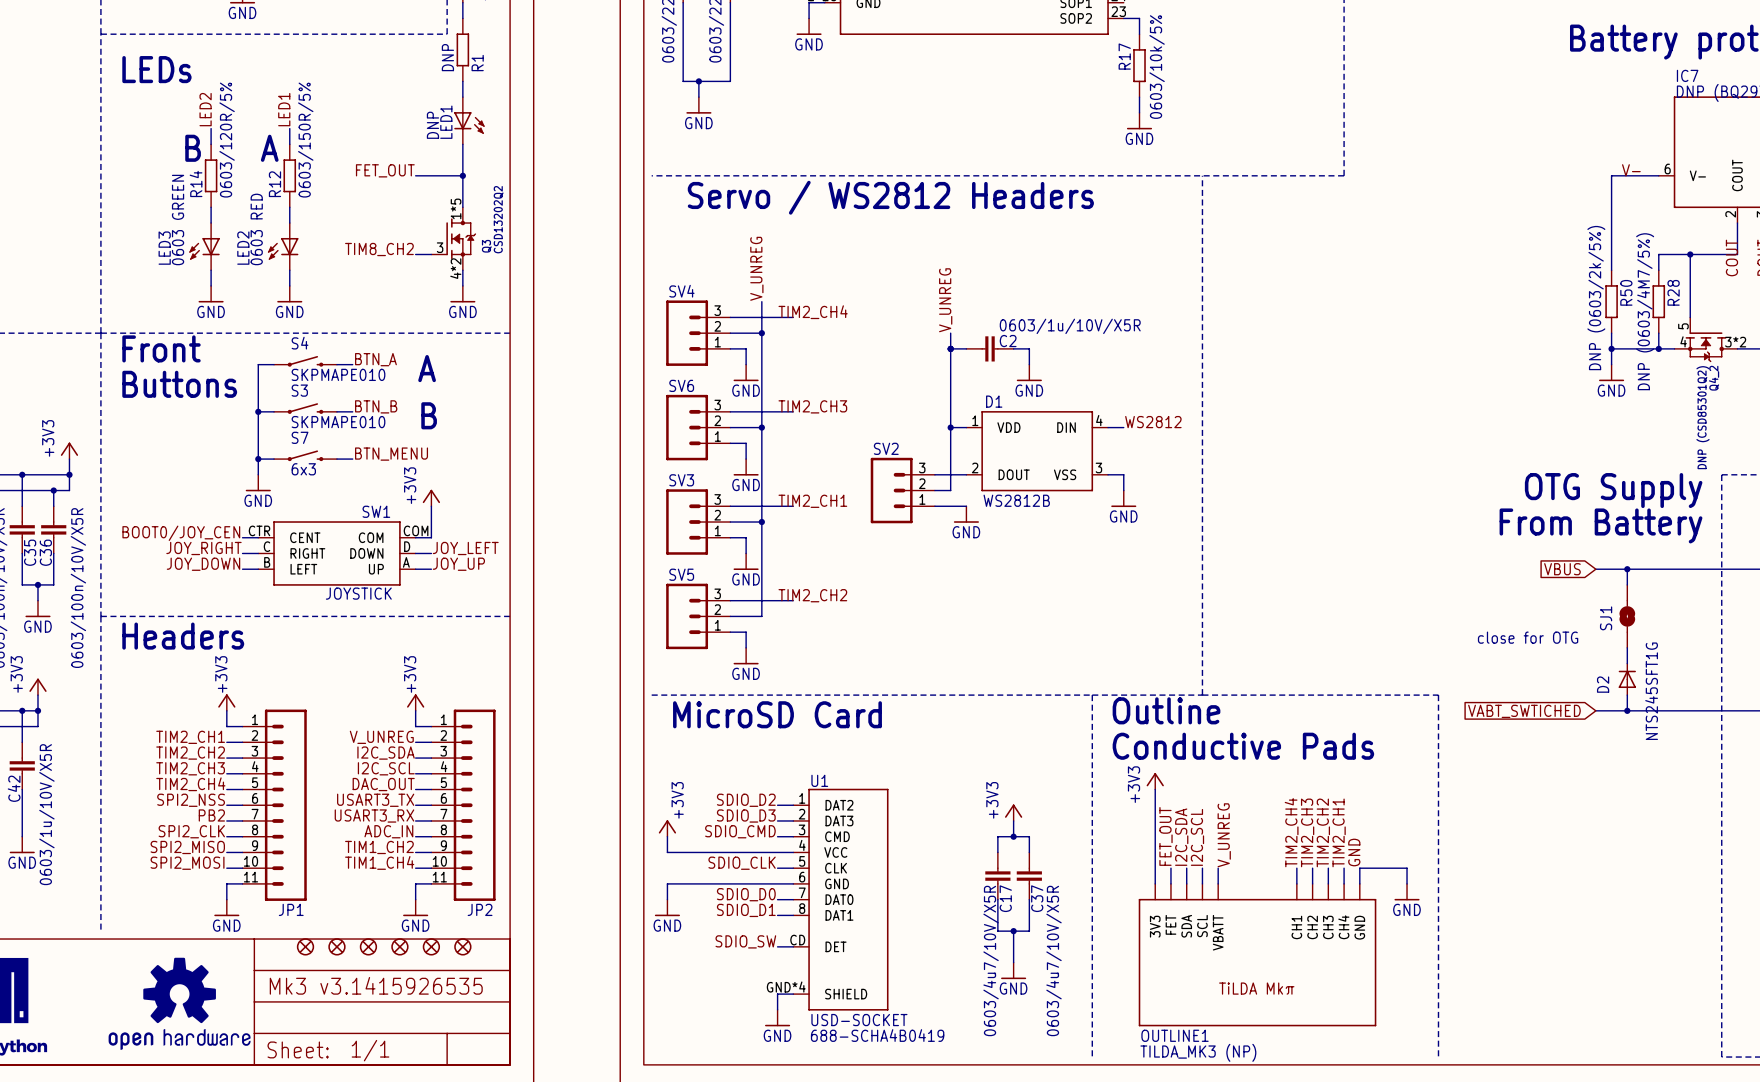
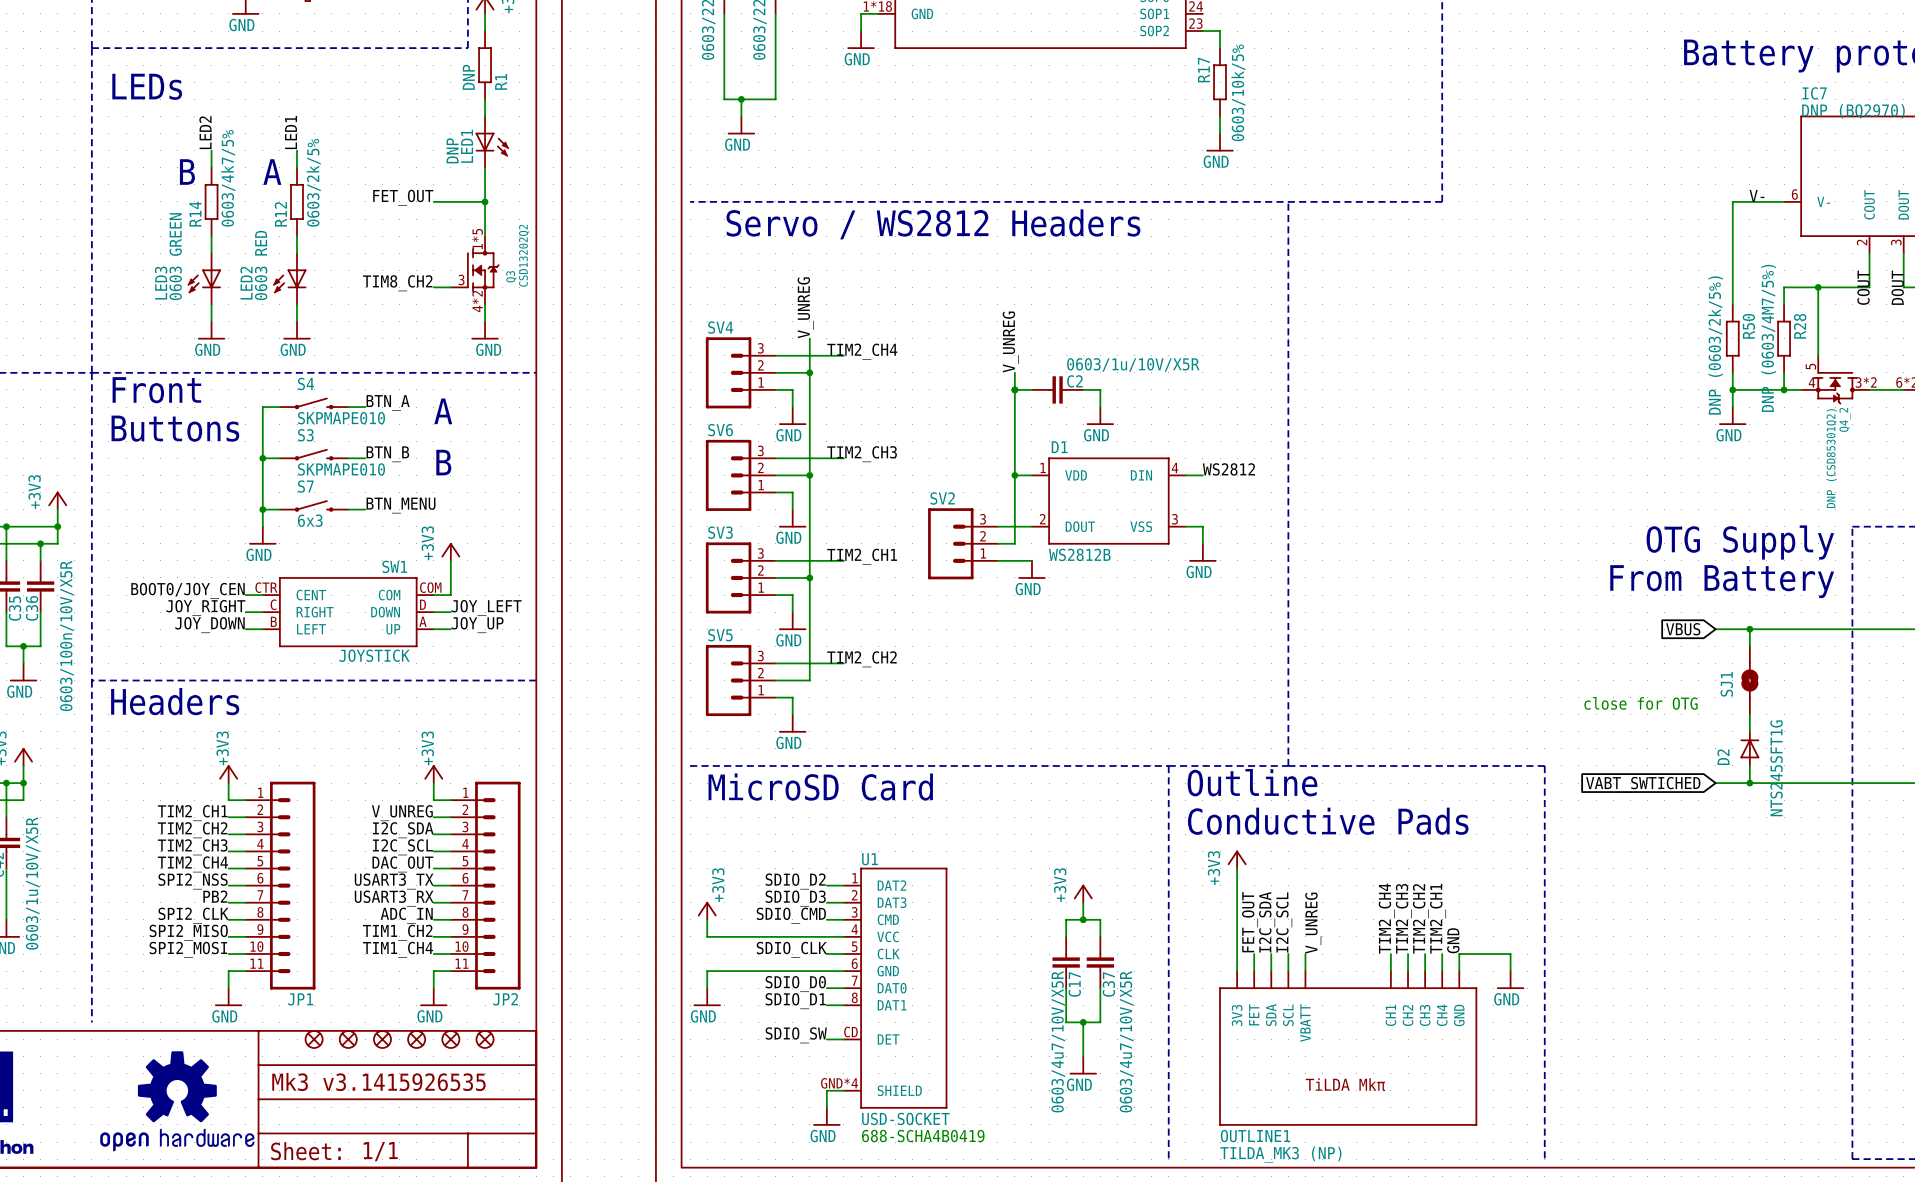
R14 value: 0603/120R/5% (227, 140) -> 0603/4k7/5% (228, 178)
R12 value: 0603/150R/5% (305, 140) -> 0603/2k/5% (313, 182)

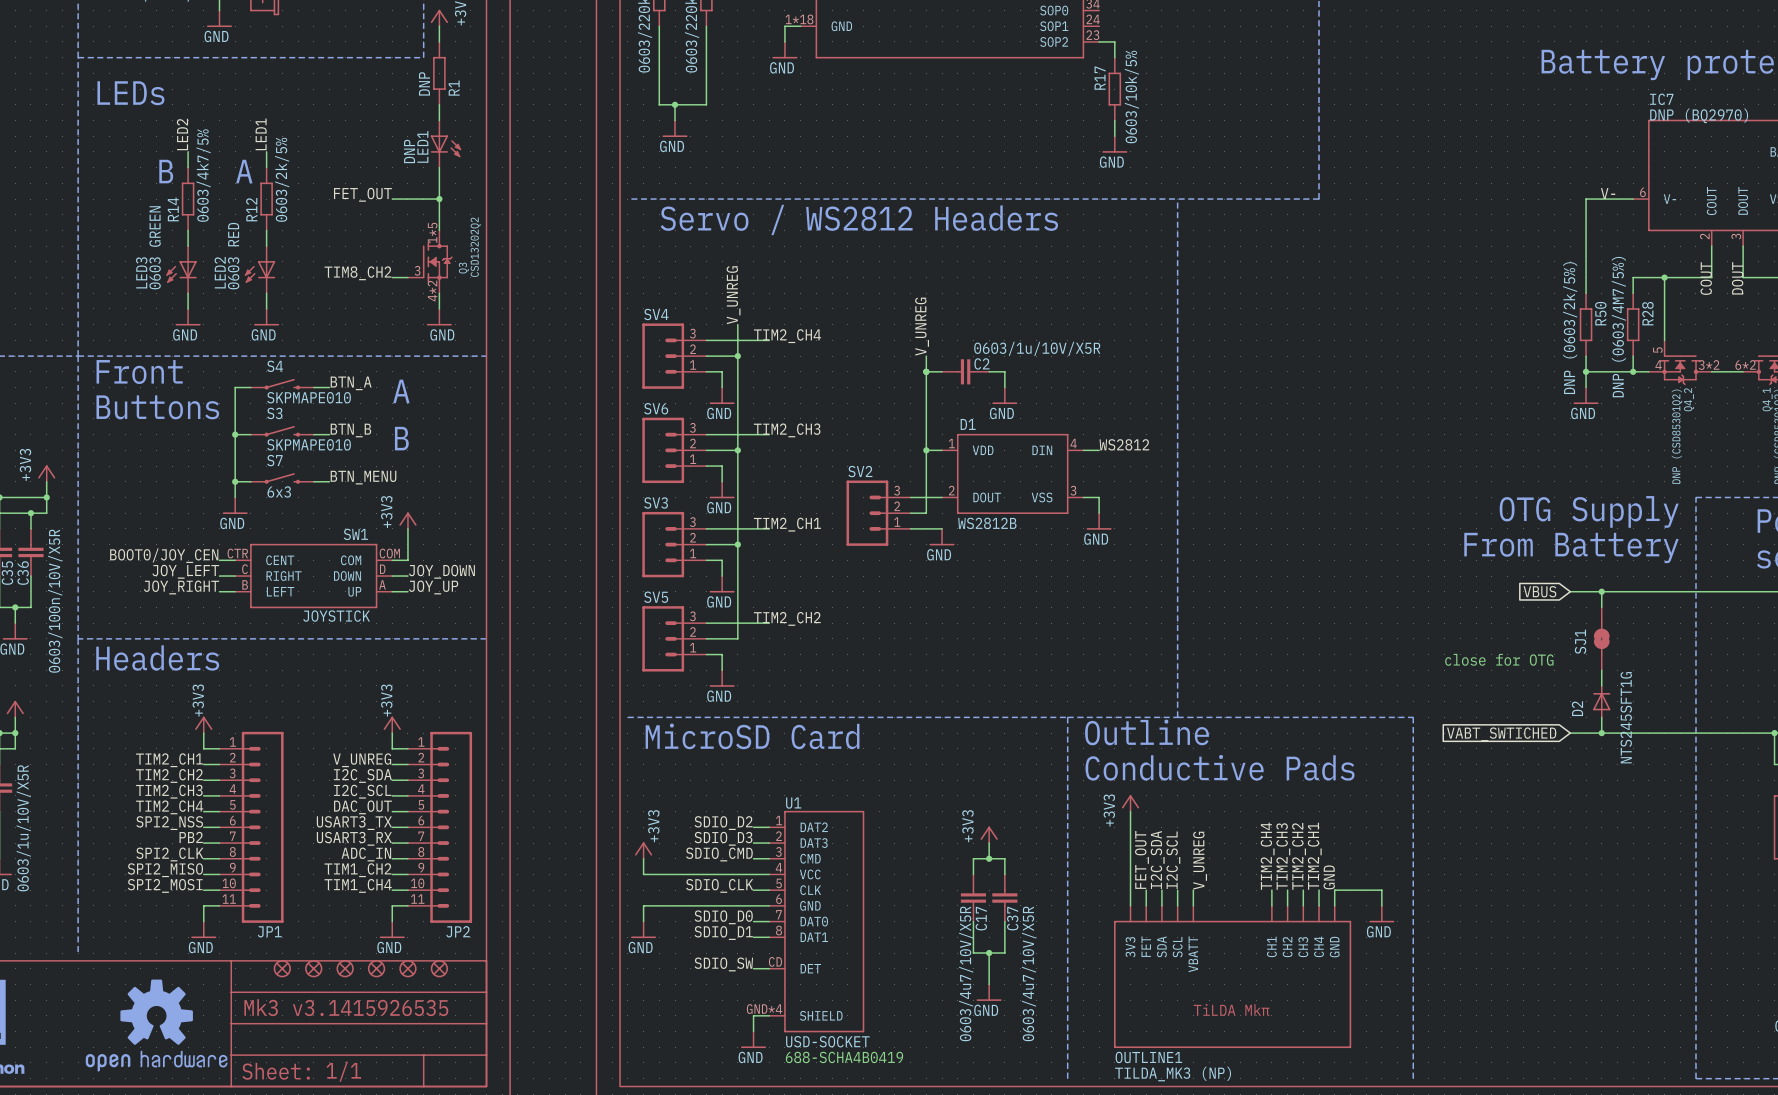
label: JOY_RIGHT (205, 607) -> JOY_LEFT (185, 571)
label: JOY_LEFT (486, 607) -> JOY_DOWN (441, 571)
label: JOY_DOWN (210, 625) -> JOY_RIGHT (181, 587)

